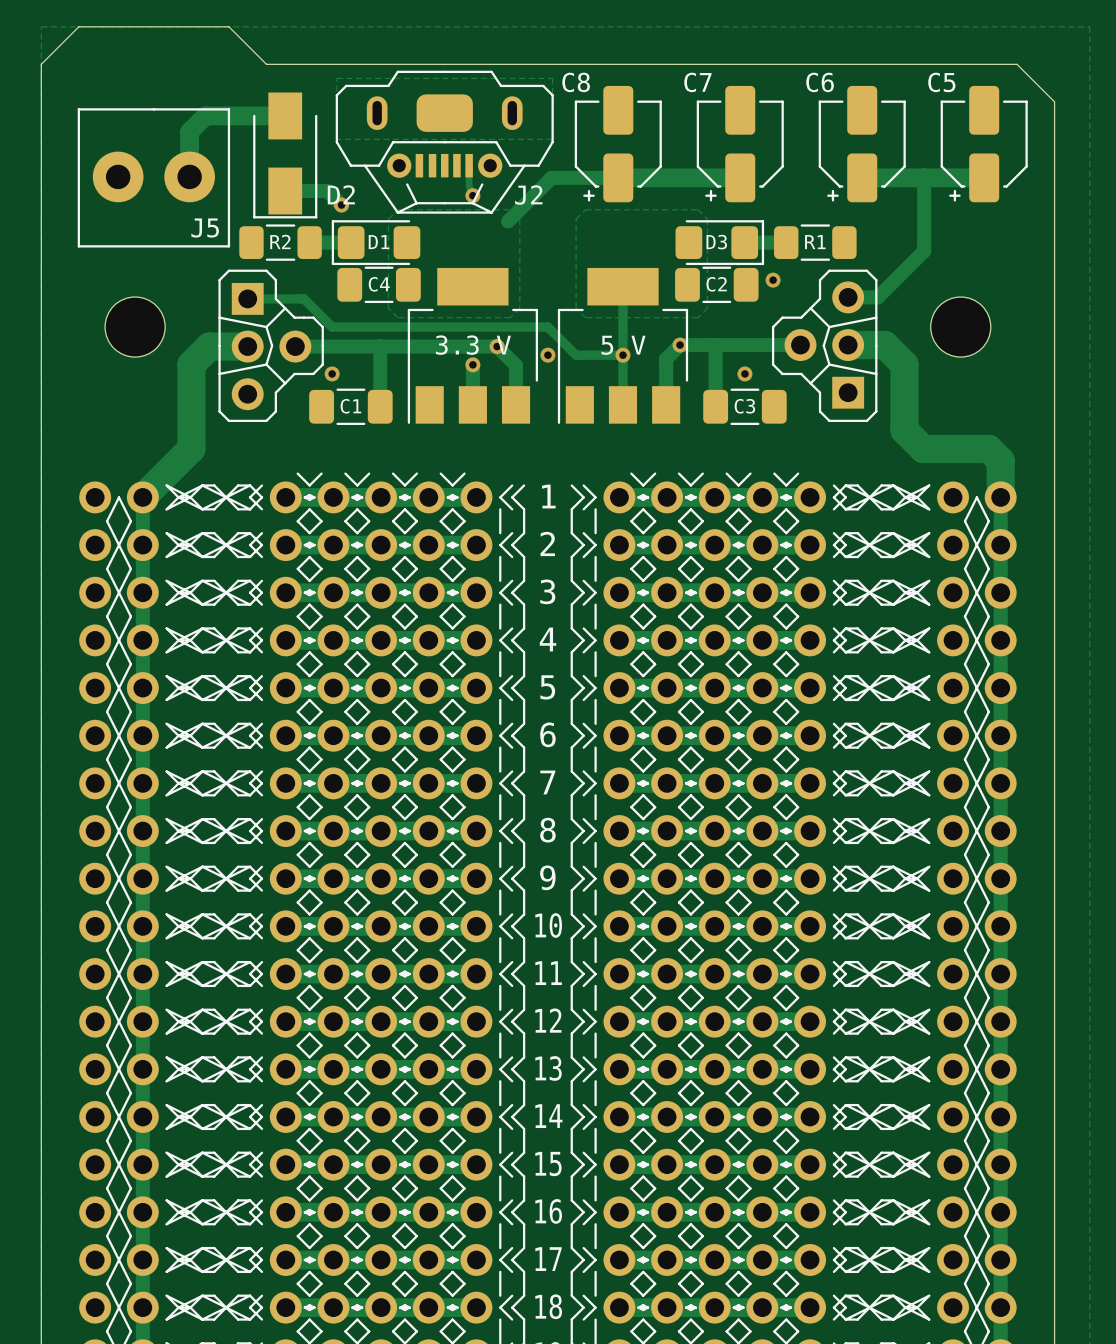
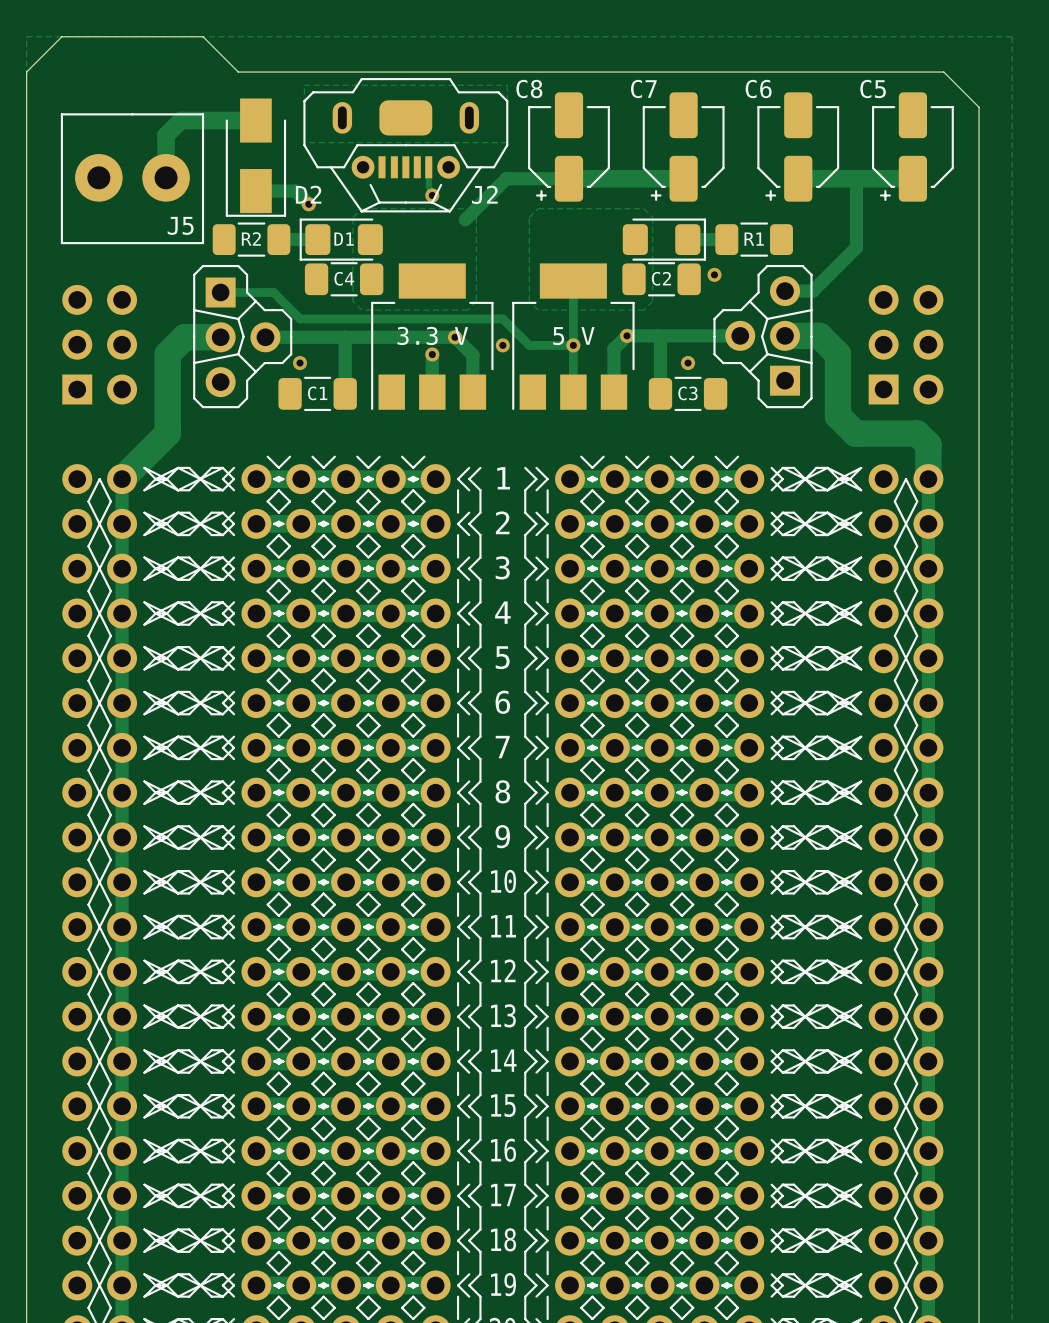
D3 name: D3 (716, 242) -> none
part: (135, 327) -> none
part: (960, 327) -> none
part: none -> (99, 344)
part: none -> (906, 344)

